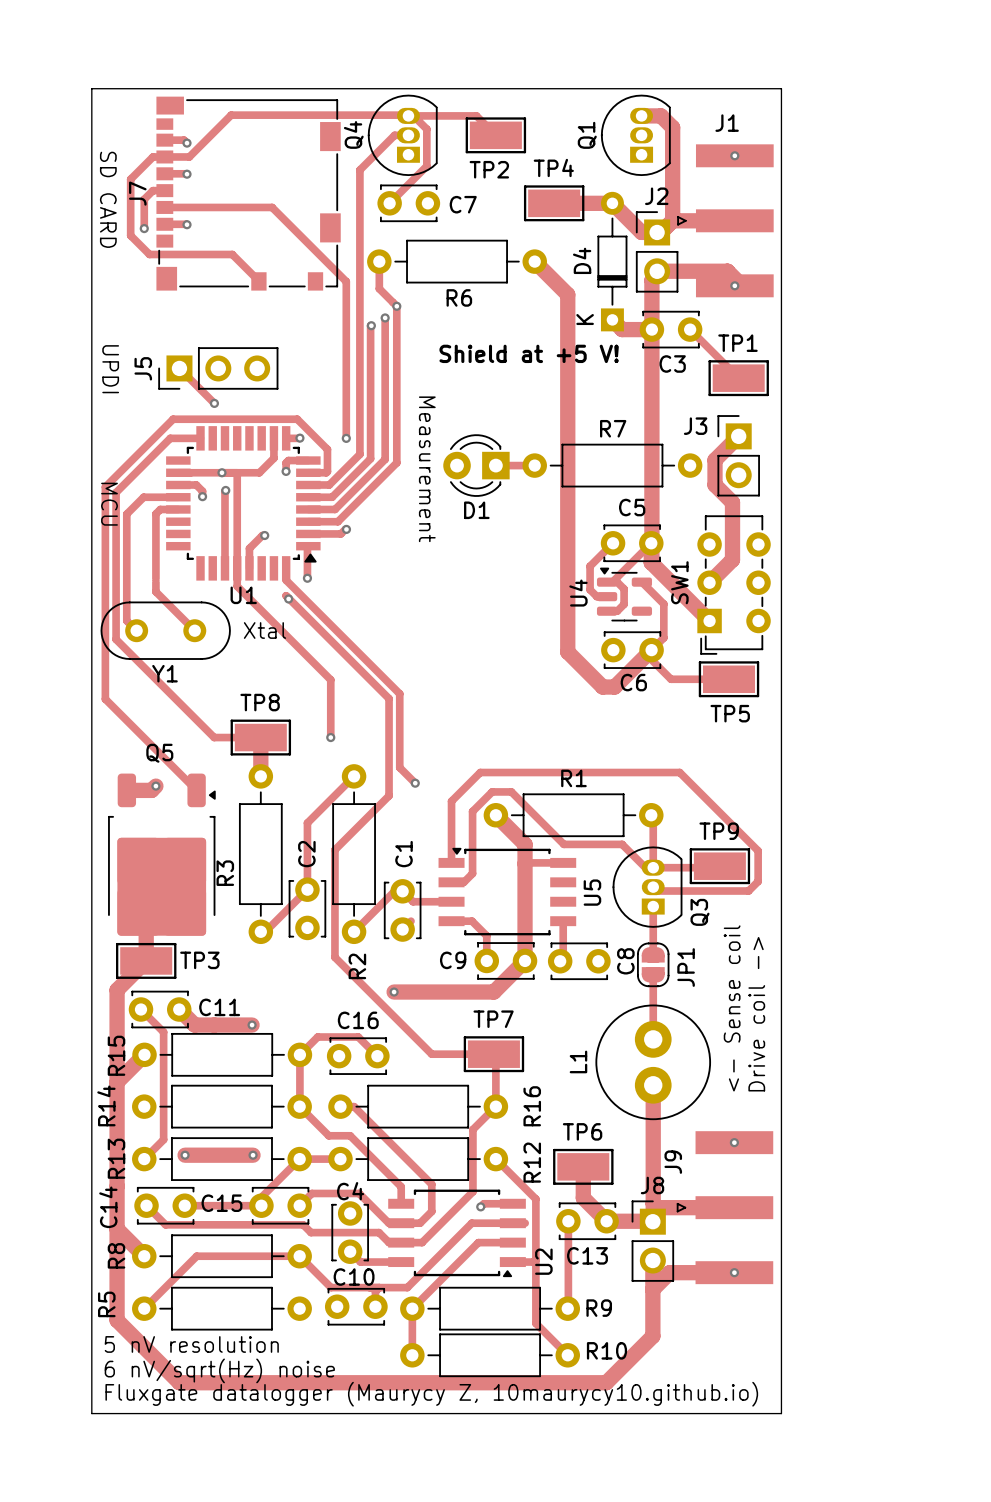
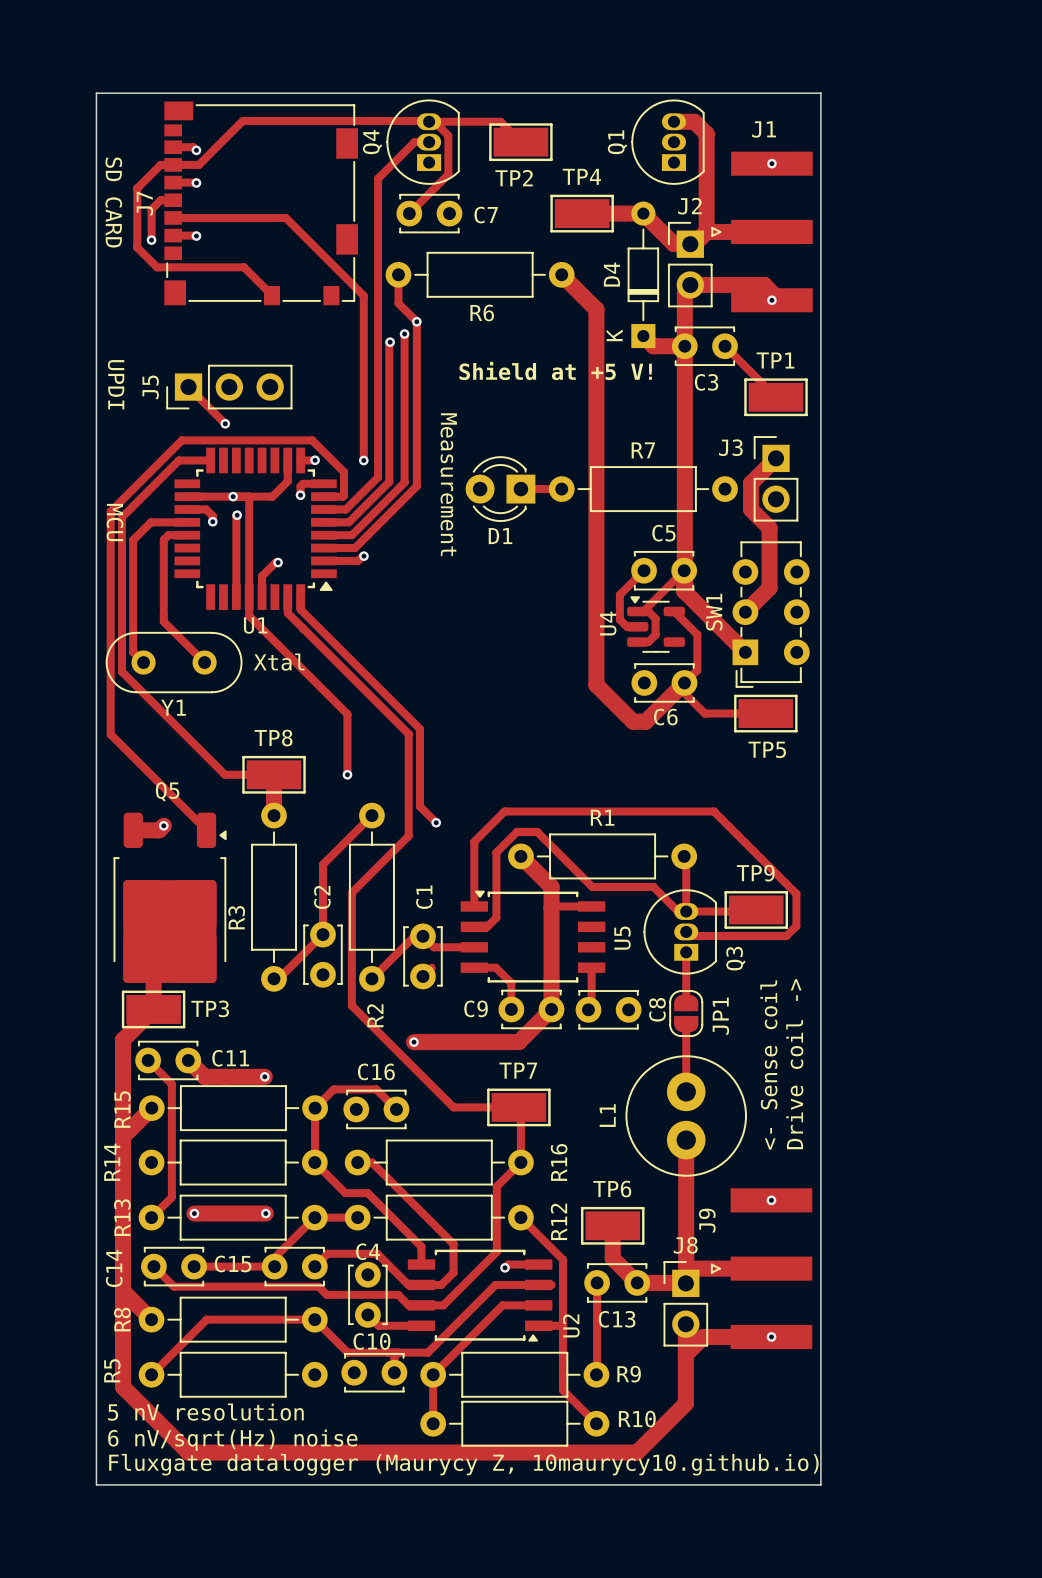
track: (308, 546) (307, 578) -> none
track: none -> (287, 597) (287, 613) (300, 625)
via: (307, 578) -> none
via: (288, 598) -> none

